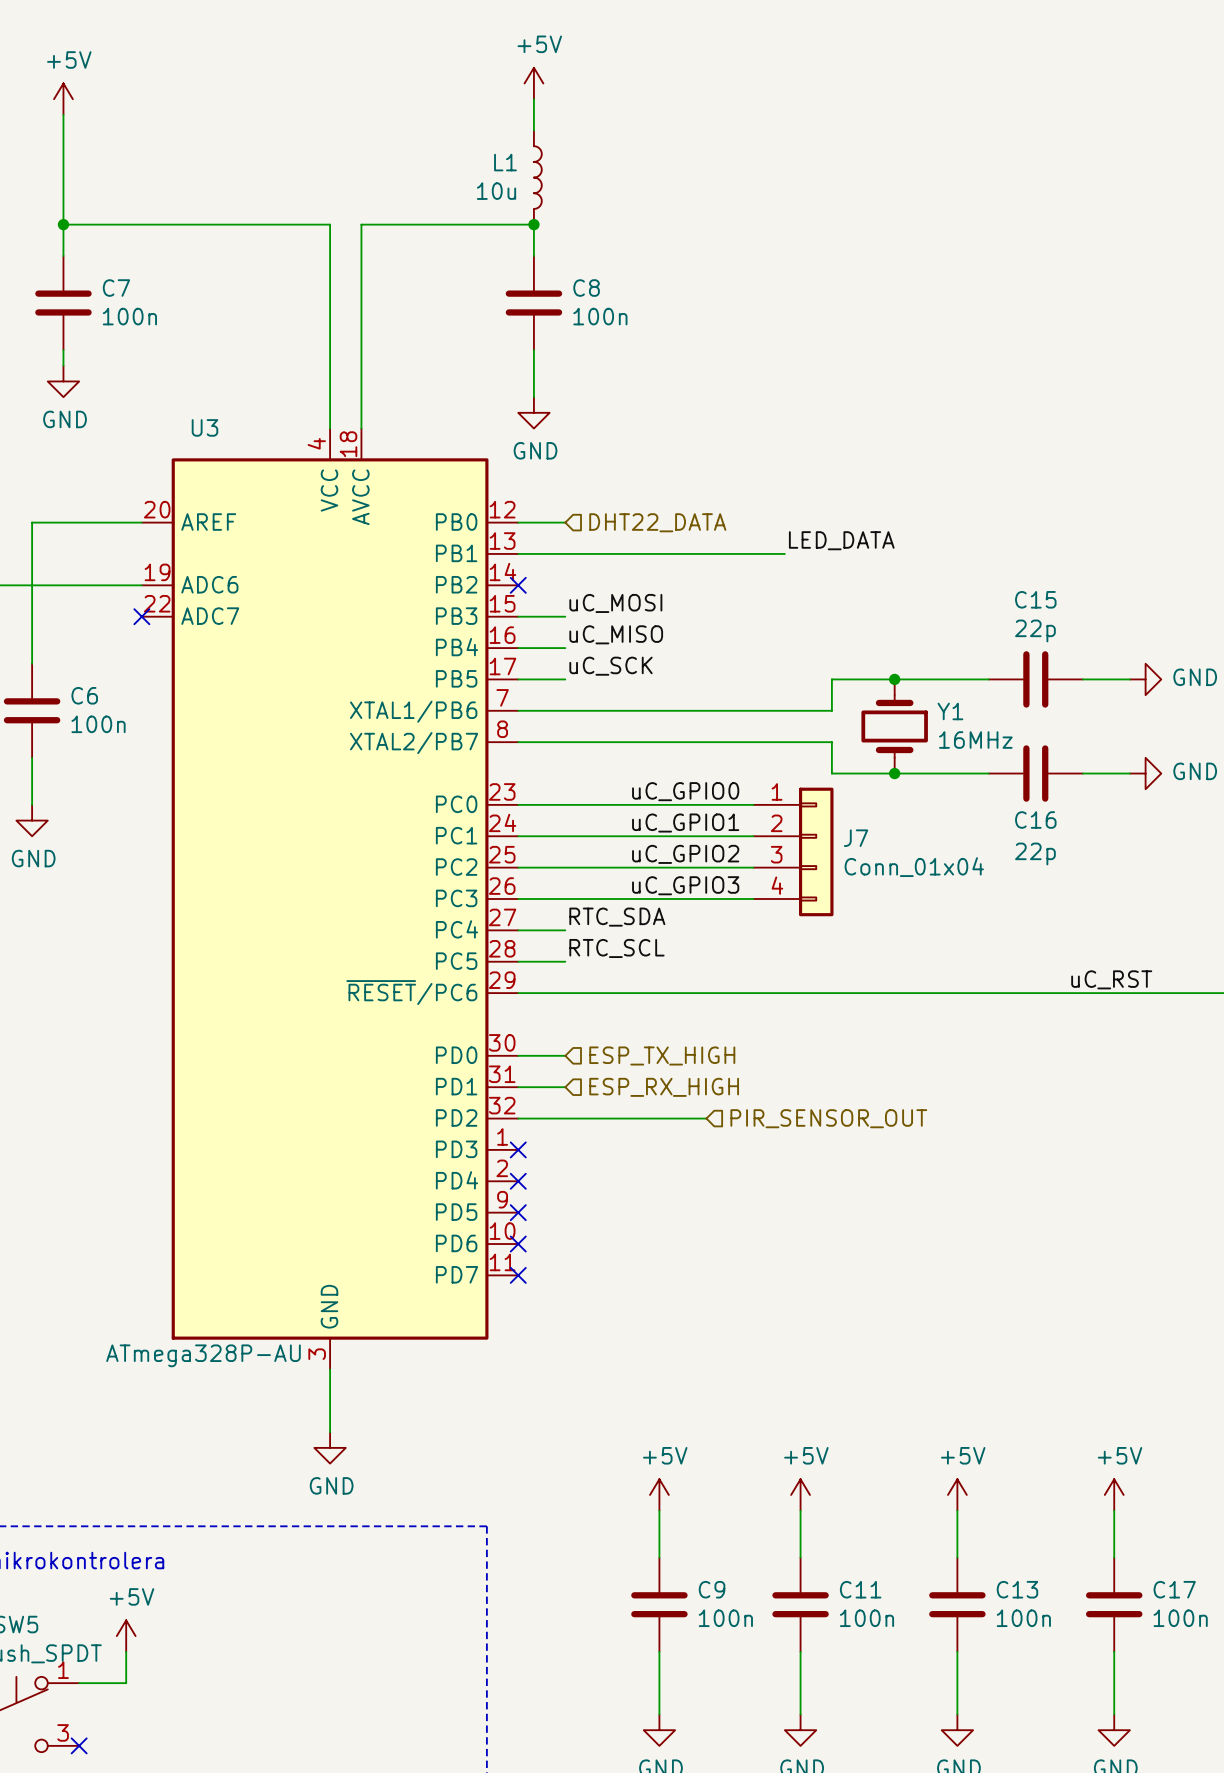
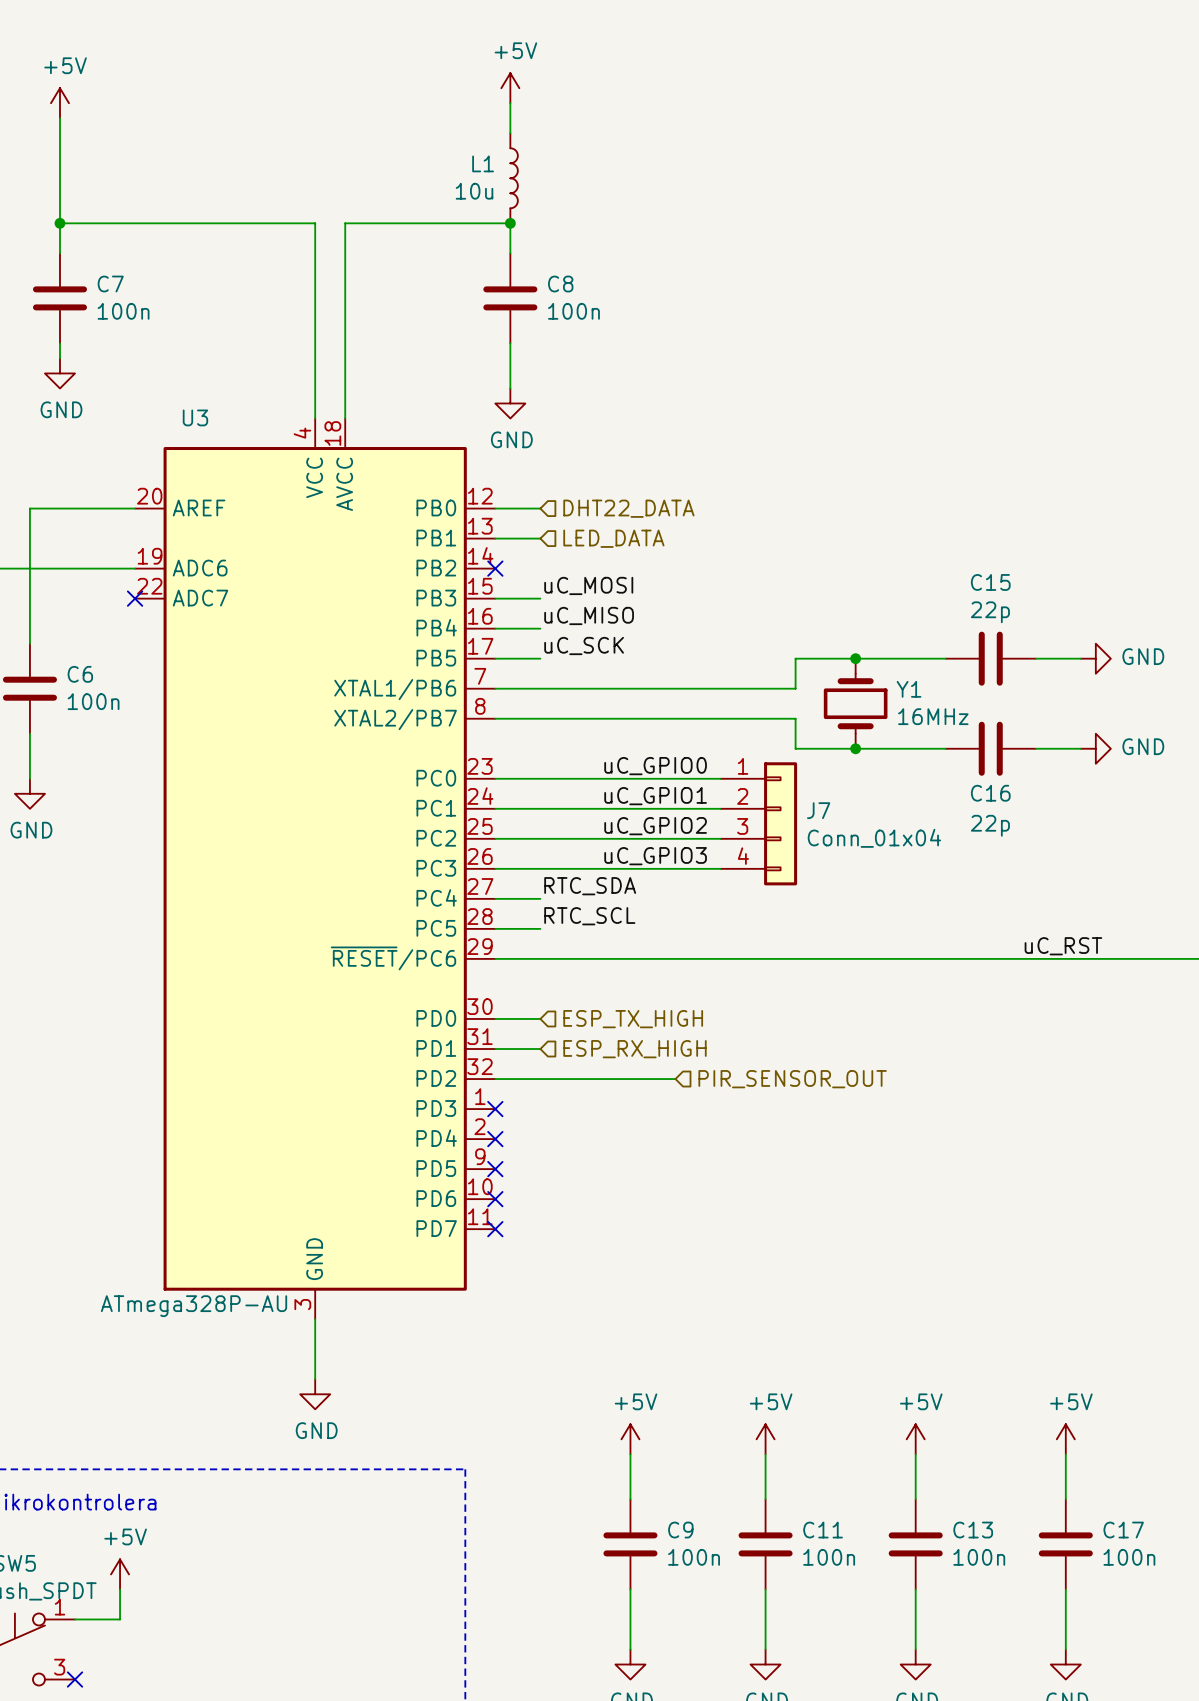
label: LED_DATA (841, 540) -> none
wire: (565, 553) (784, 553) -> none
hierarchical label: none -> LED_DATA (613, 538)

